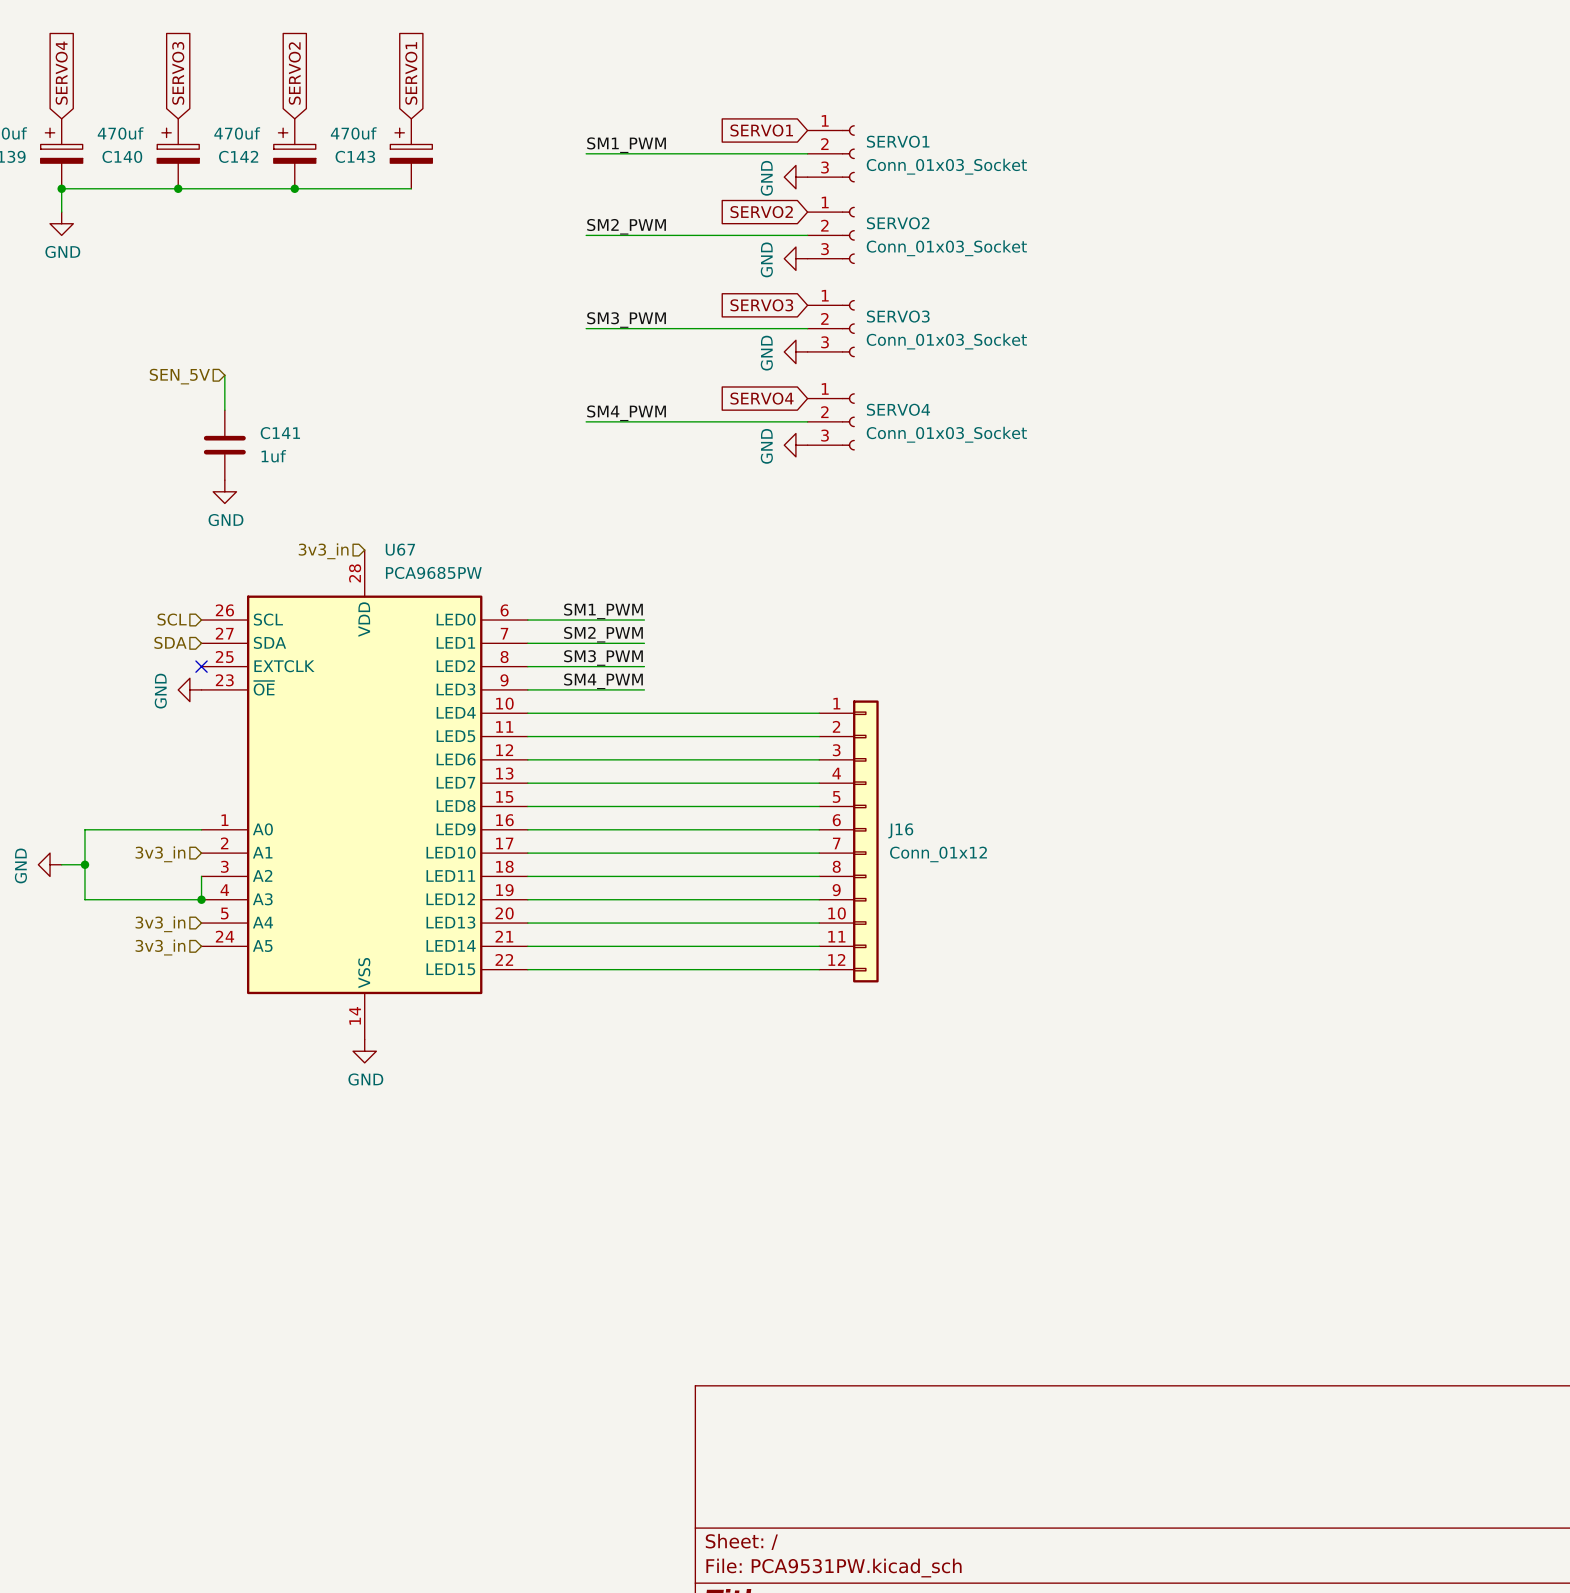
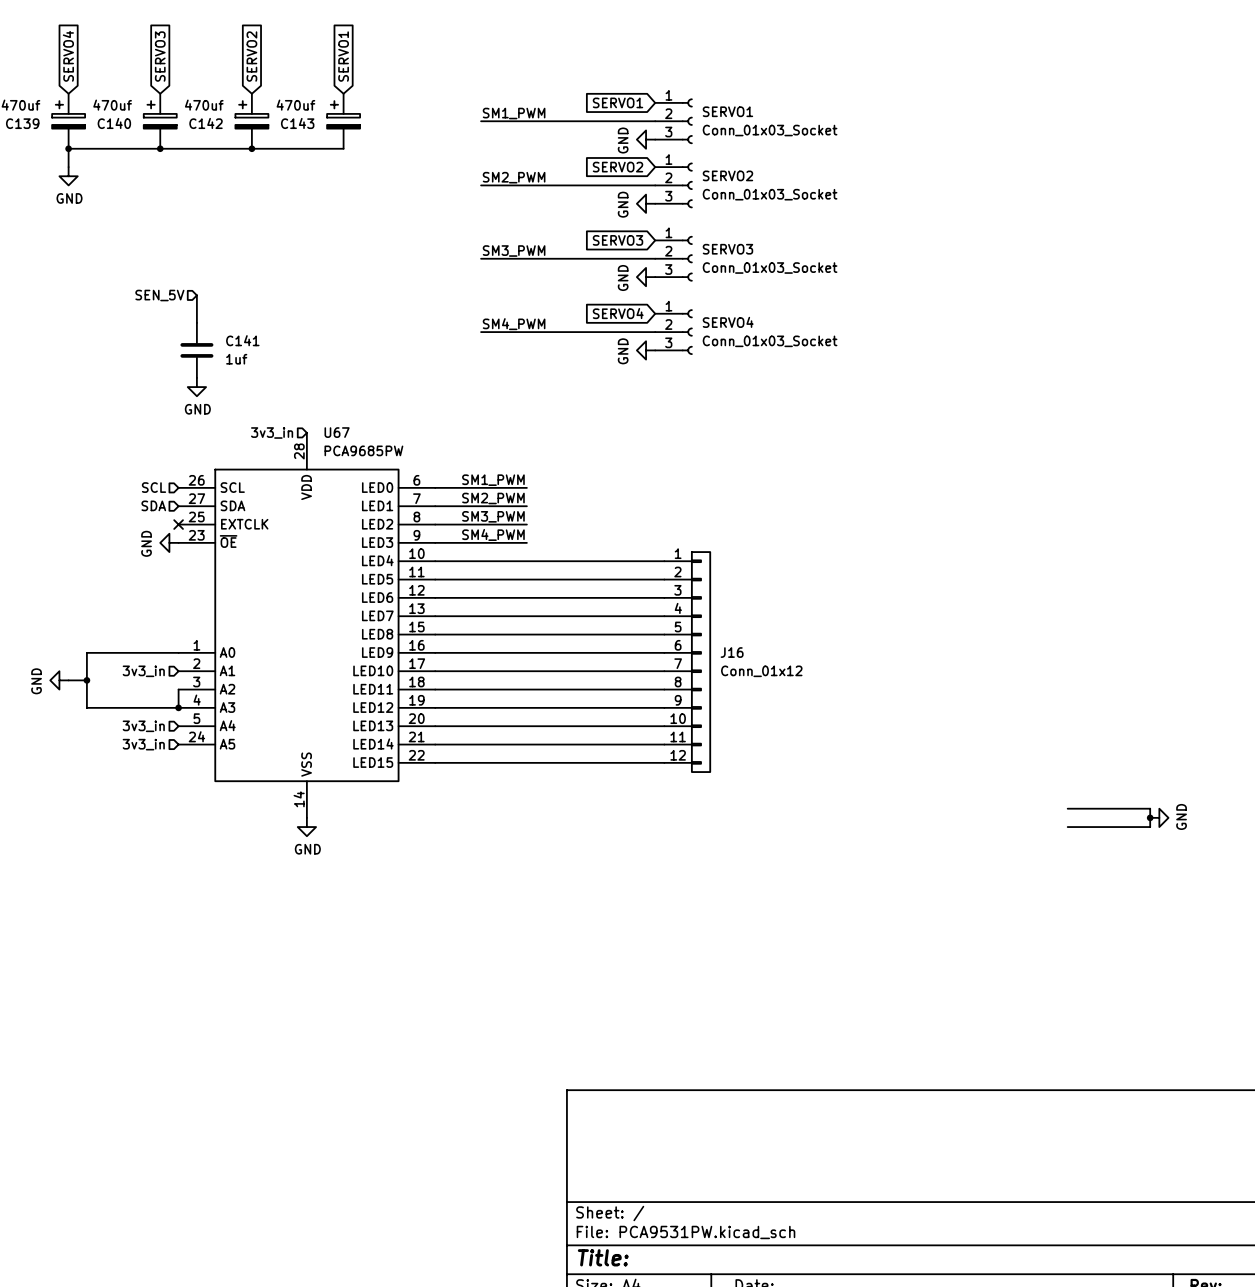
wire: none -> (1067, 808) (1150, 808) (1150, 827) (1067, 827)
junction: none -> (1150, 817)
power symbol: none -> GND (1159, 817)

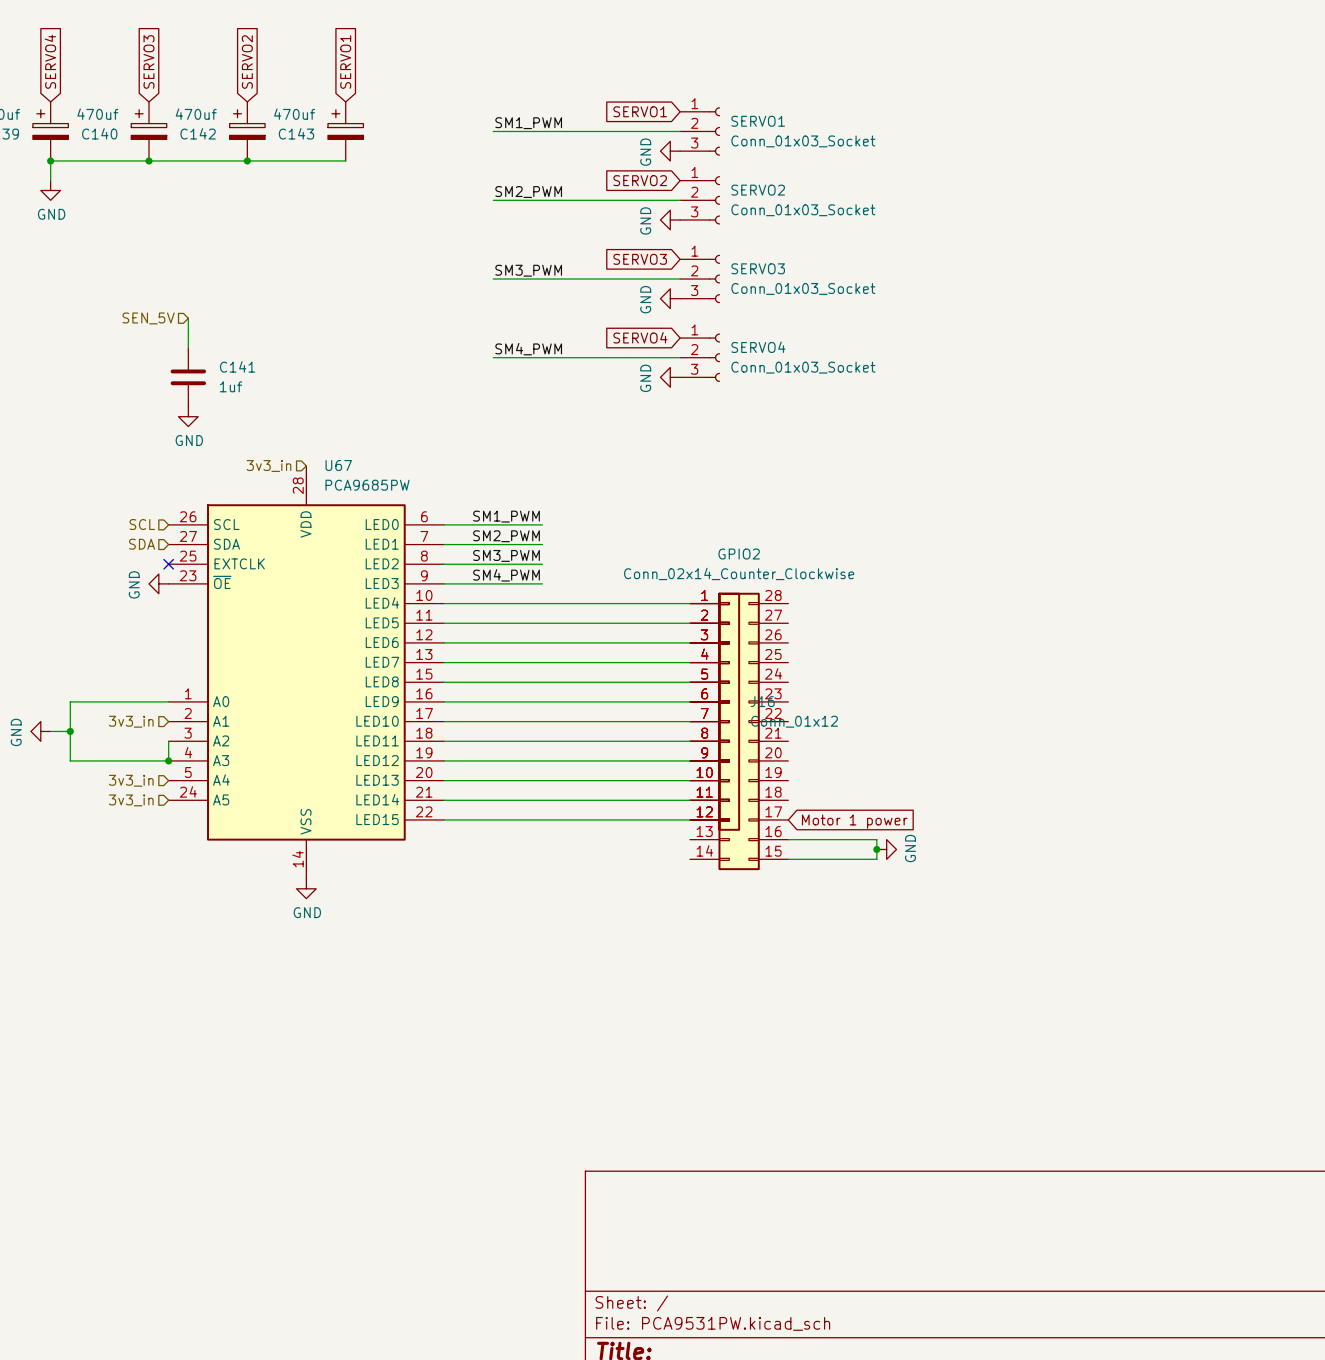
GPIO2: none -> Conn_02x14_Counter_Clockwise (739, 731)
global label: none -> Motor 1 power (854, 821)
wire: none -> (788, 839) (876, 839) (876, 859) (788, 859)
junction: none -> (876, 849)
power symbol: none -> GND (886, 849)
wire: (1067, 808) (1150, 808) (1150, 827) (1067, 827) -> none
junction: (1150, 817) -> none
power symbol: GND (1159, 817) -> none

